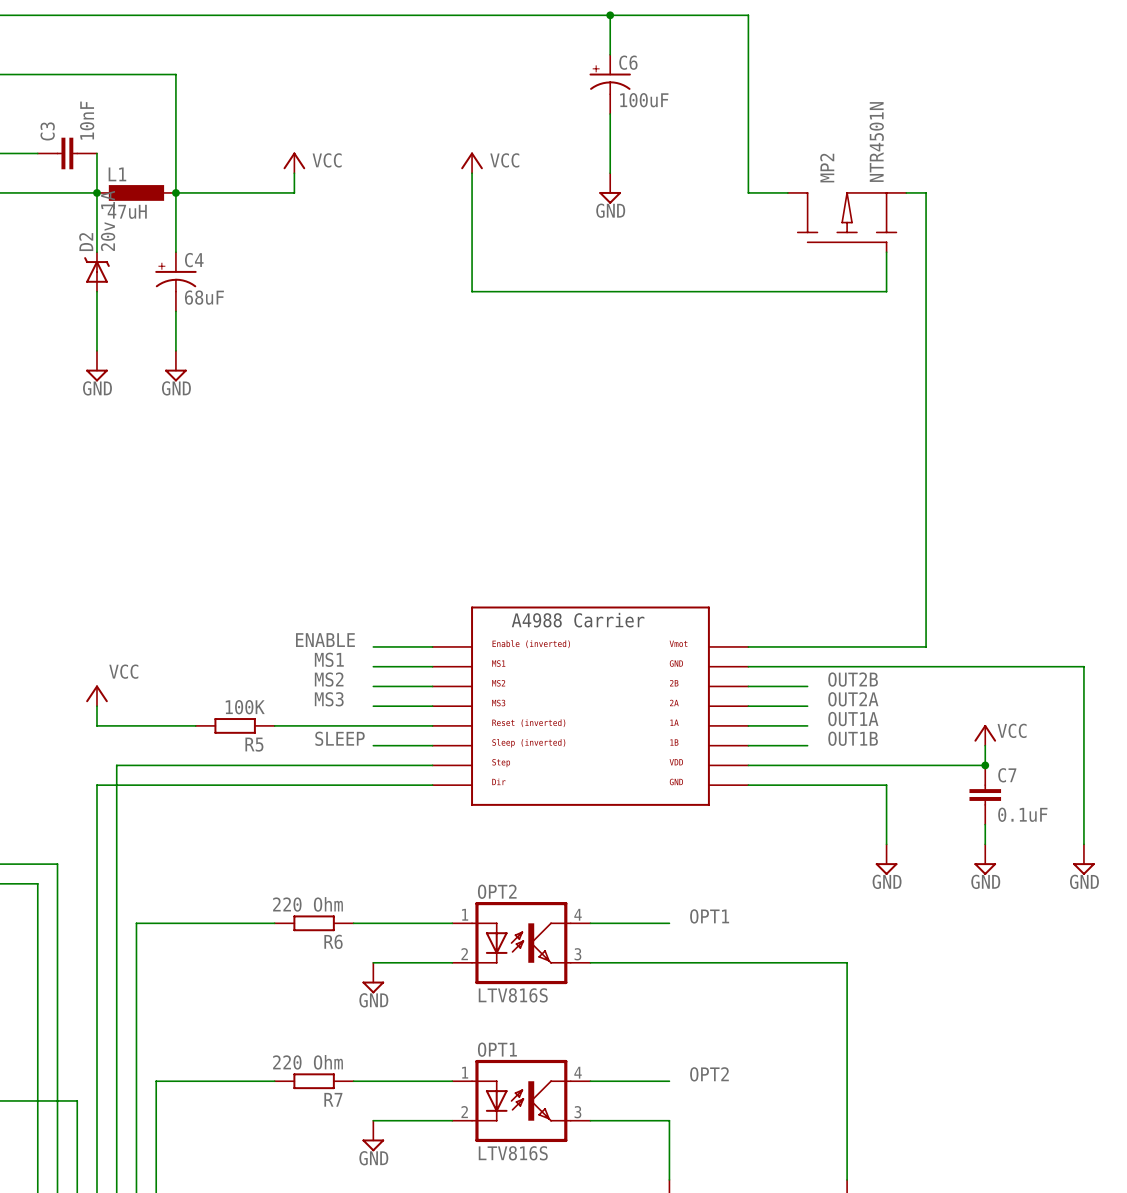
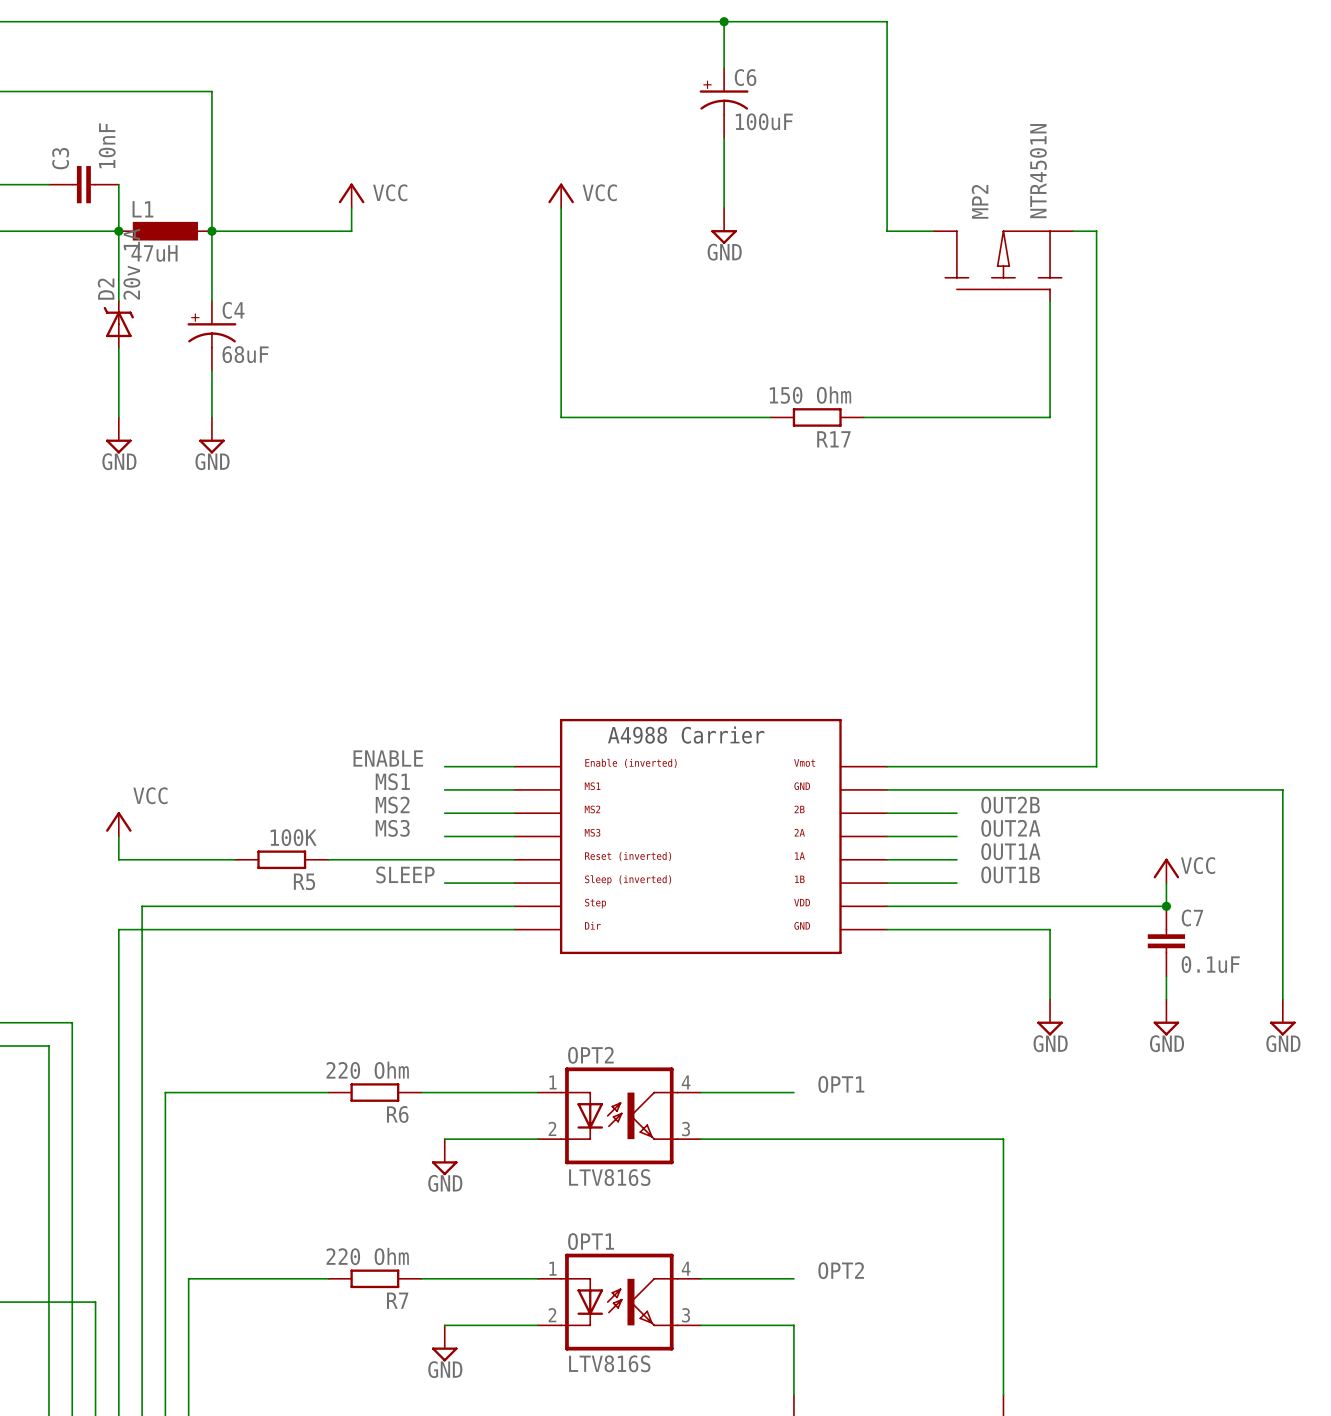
wire: (472, 291) (886, 291) -> (561, 347) (561, 417) (770, 417)
wire: none -> (1050, 347) (1050, 417) (863, 417)
R17: none -> 150 Ohm (817, 417)

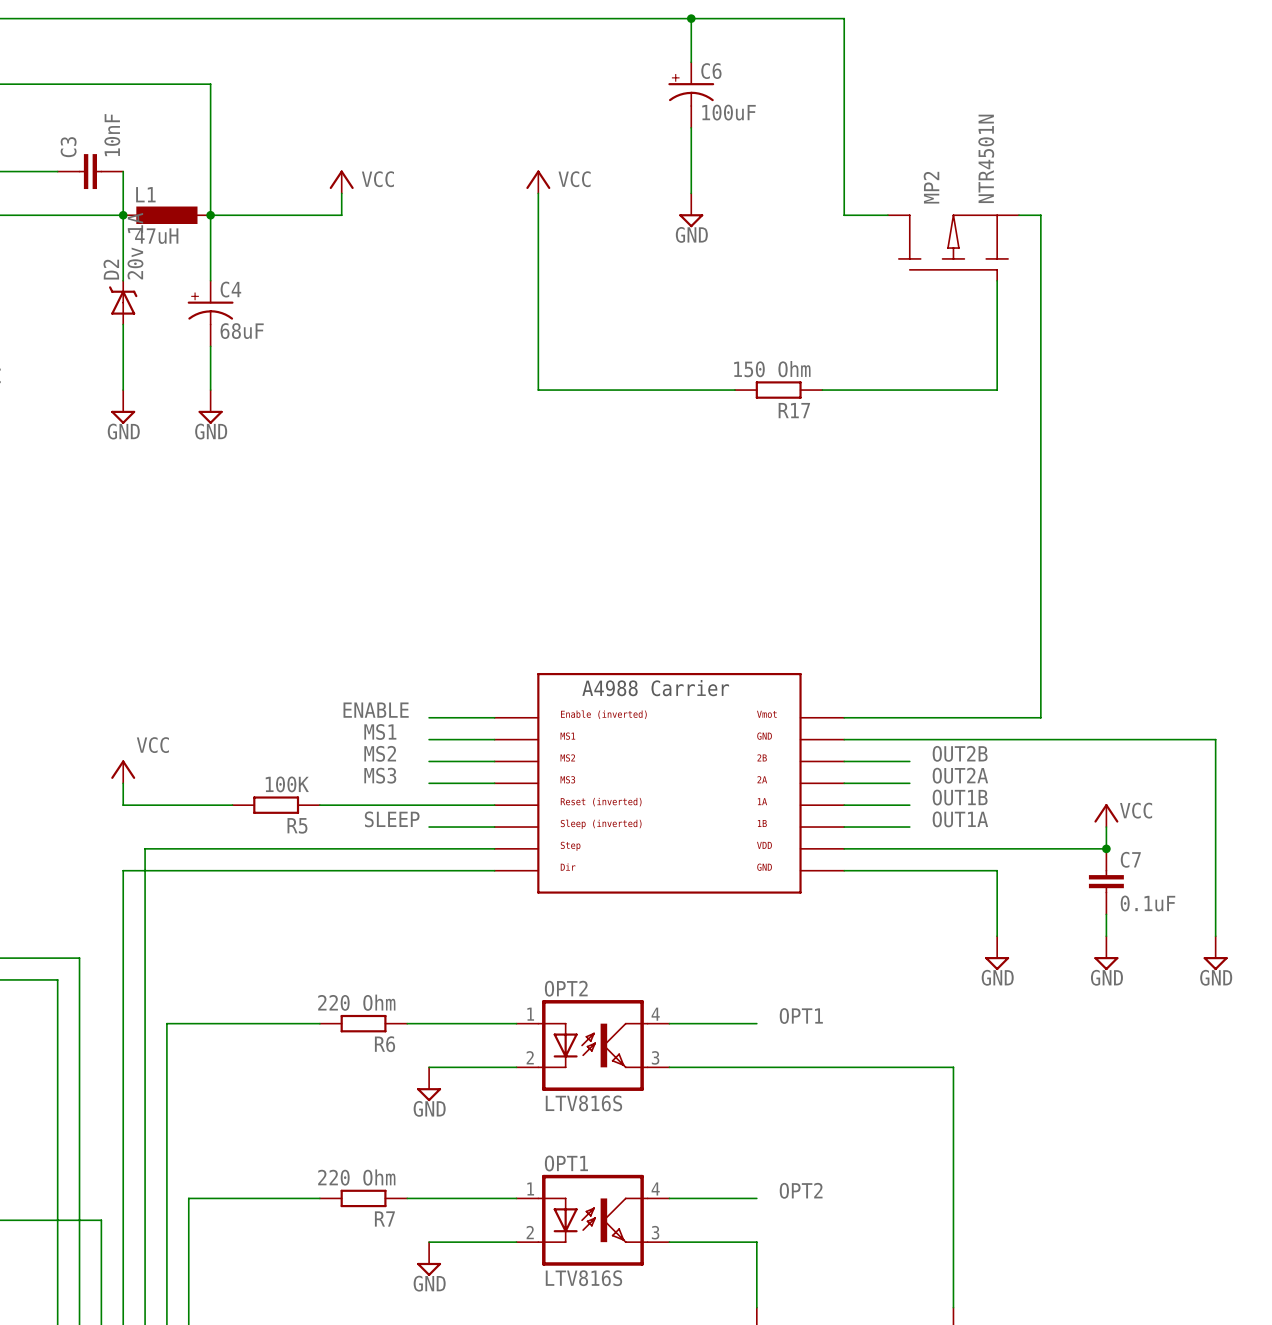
label: OUT1A (1010, 851) -> OUT1B (960, 797)
label: OUT1B (1010, 874) -> OUT1A (960, 819)

